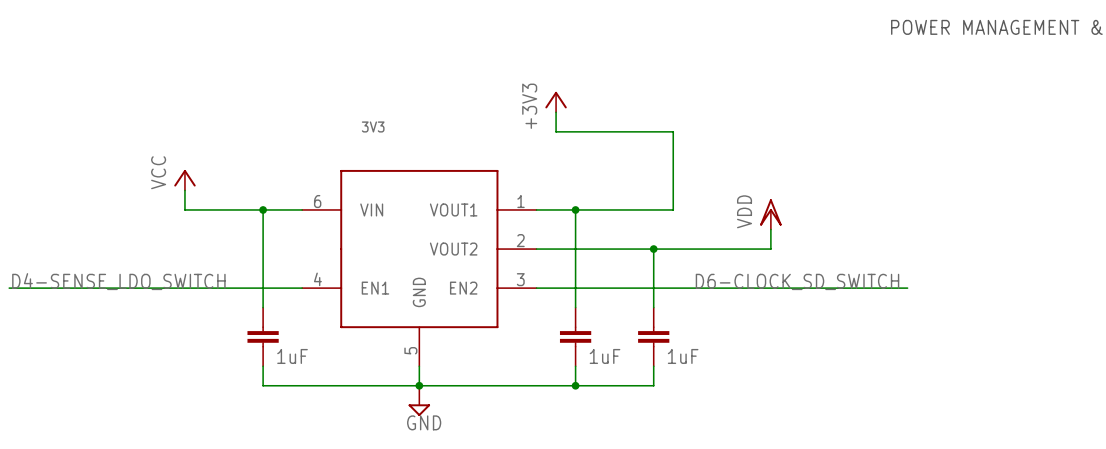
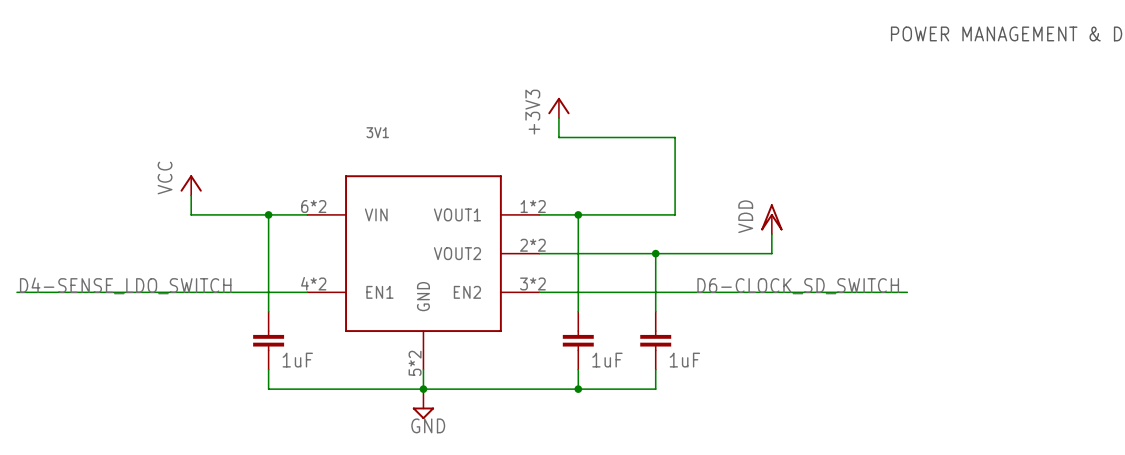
3V3: (419, 268) -> none
3V1: none -> (423, 272)

